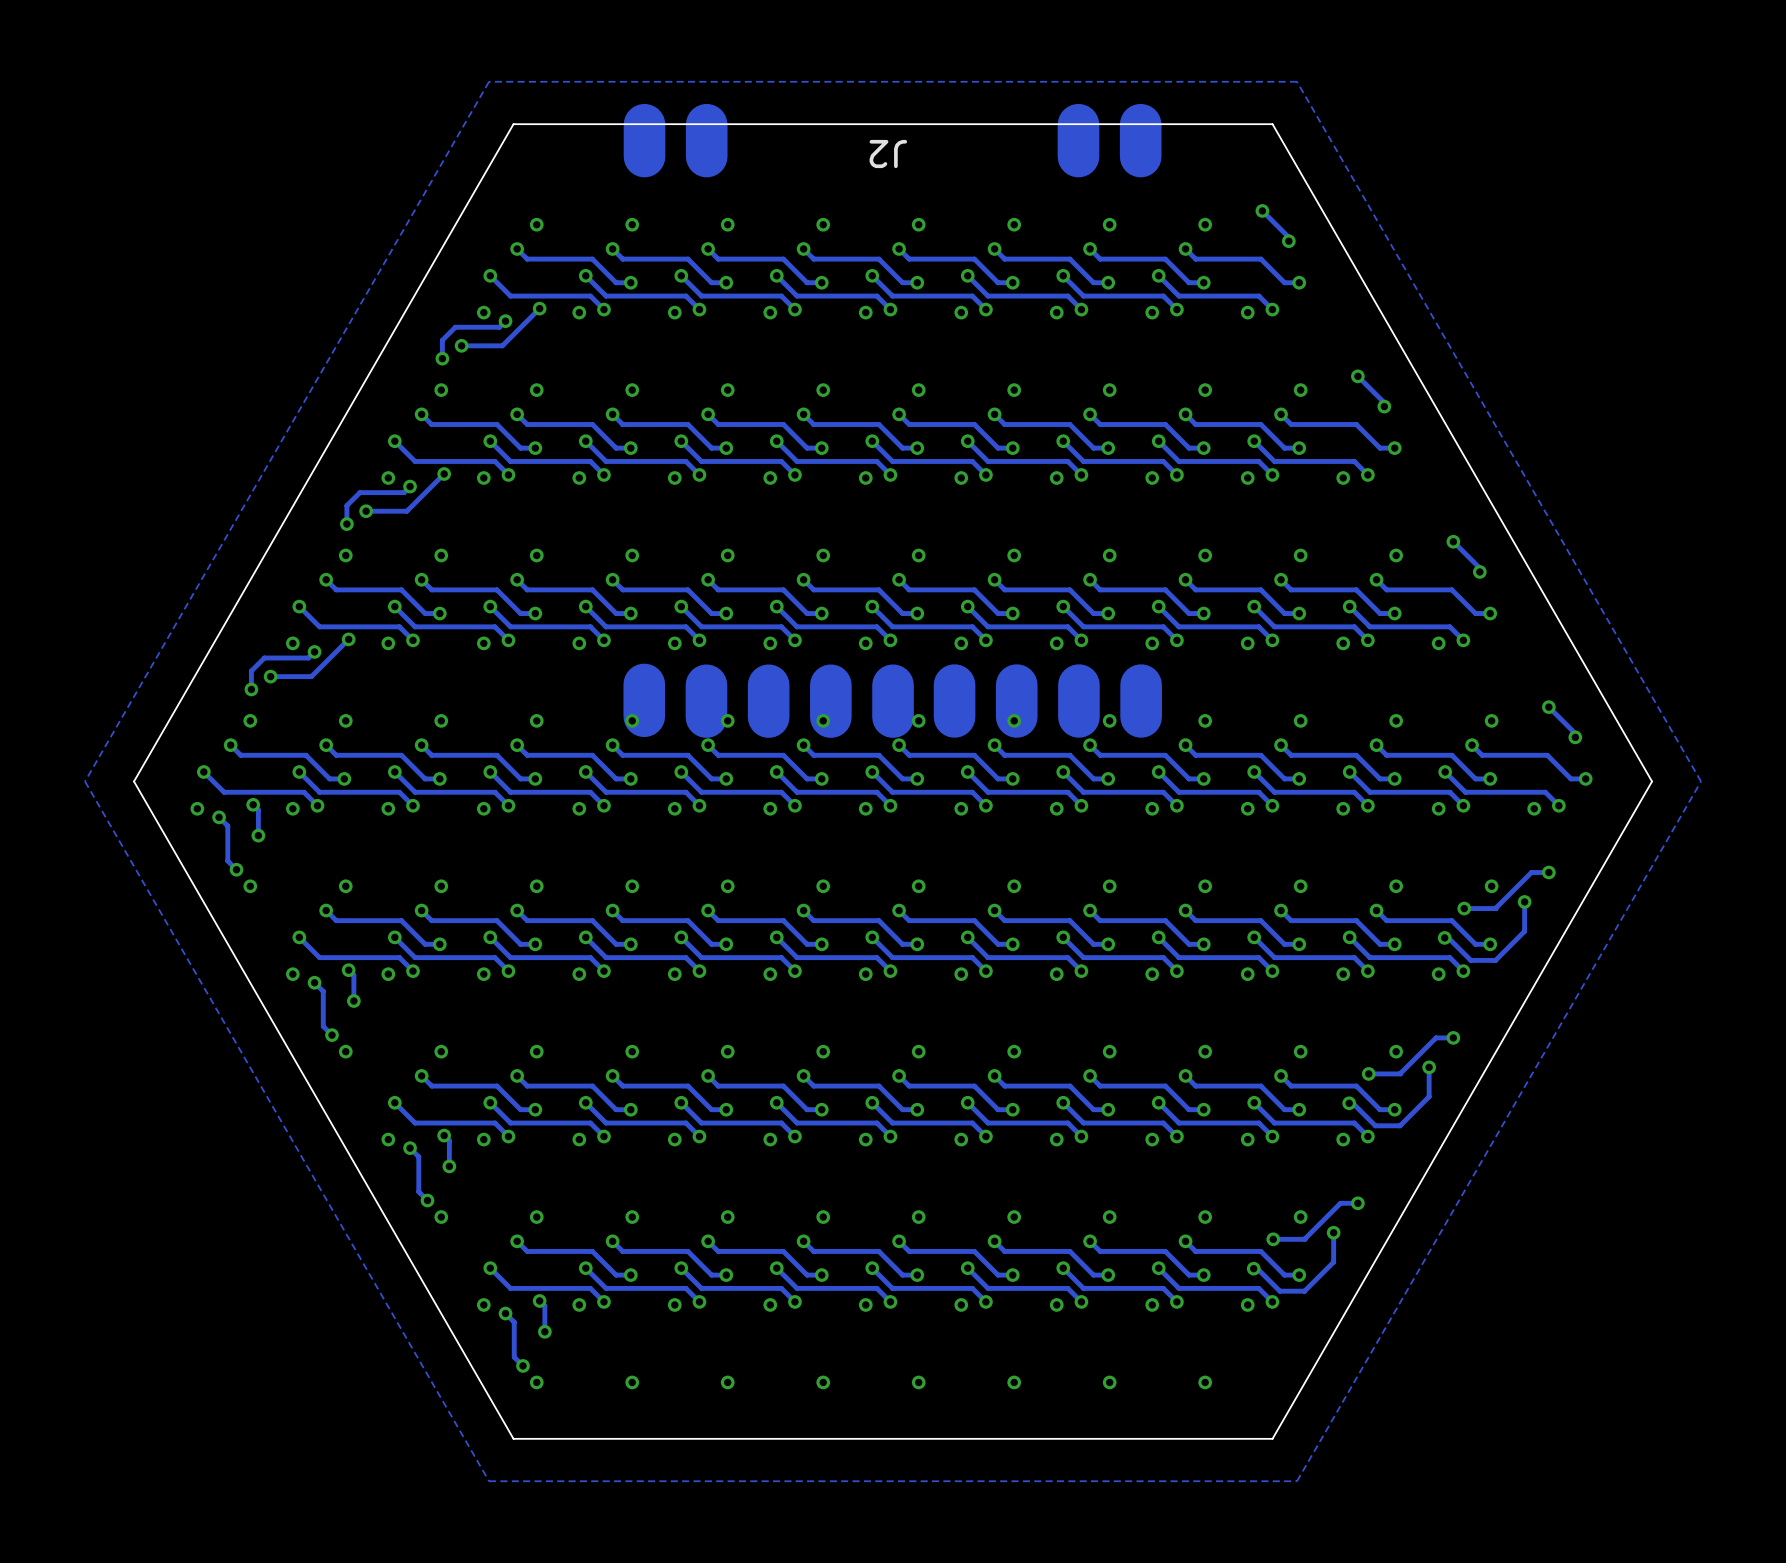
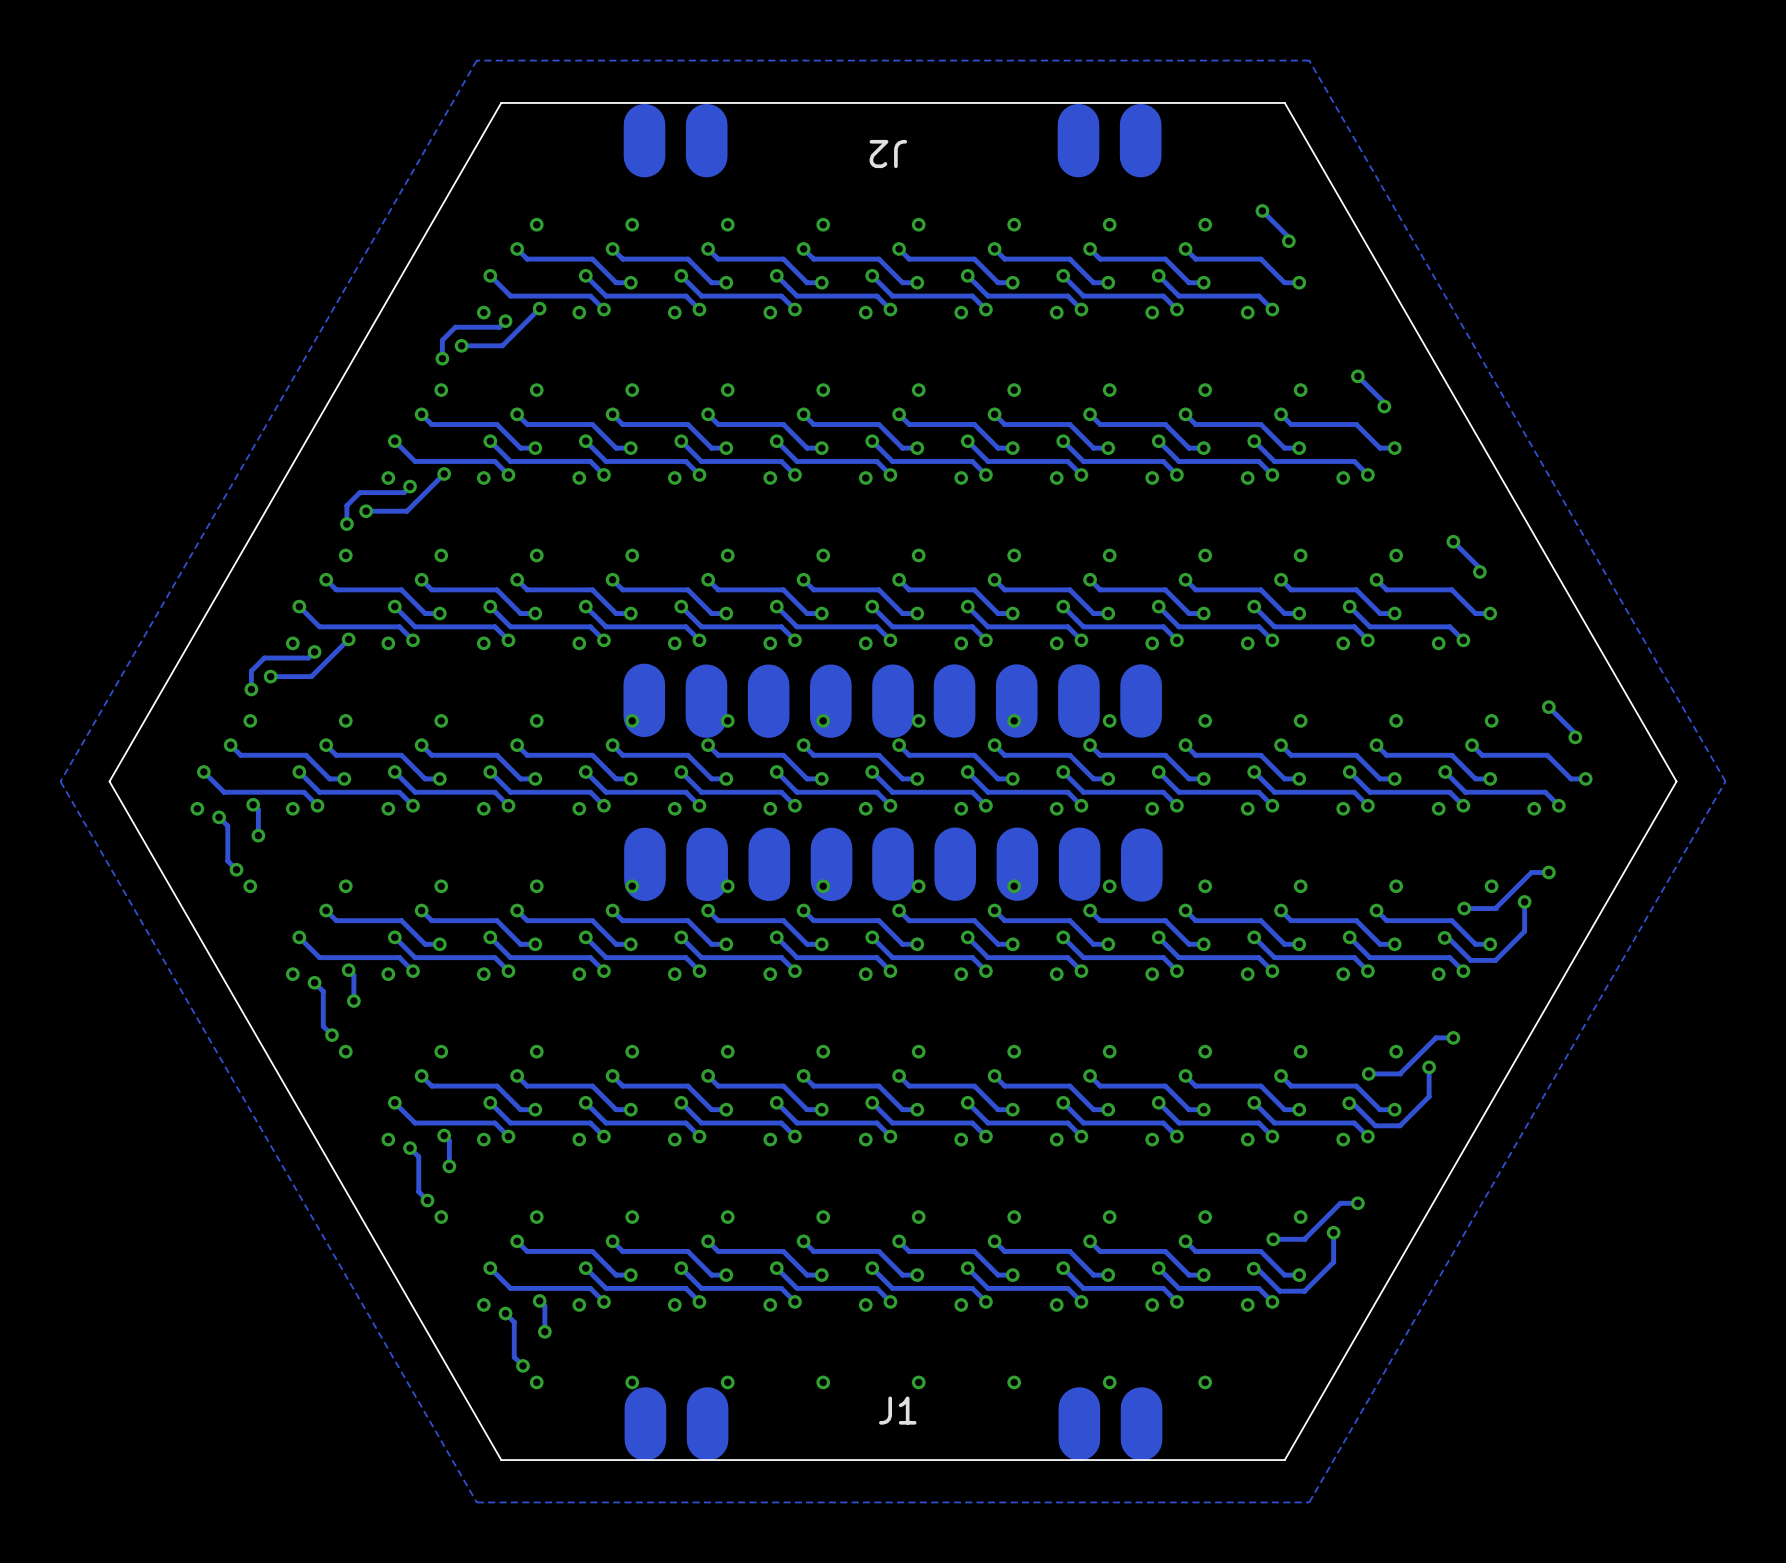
zone outline: (1297, 81) (1701, 781) (1297, 1481) (489, 1481) (85, 781) (489, 81) (1297, 81) -> (1309, 60) (1725, 781) (1309, 1502) (476, 1502) (60, 781) (476, 60) (1309, 60)
board edge: (1272, 124) (1652, 781) (1272, 1438) (513, 1438) (134, 781) (513, 124) (1272, 124) -> (1284, 102) (1676, 781) (1284, 1460) (501, 1460) (109, 781) (501, 102) (1284, 102)
J1: none -> (893, 1144)

